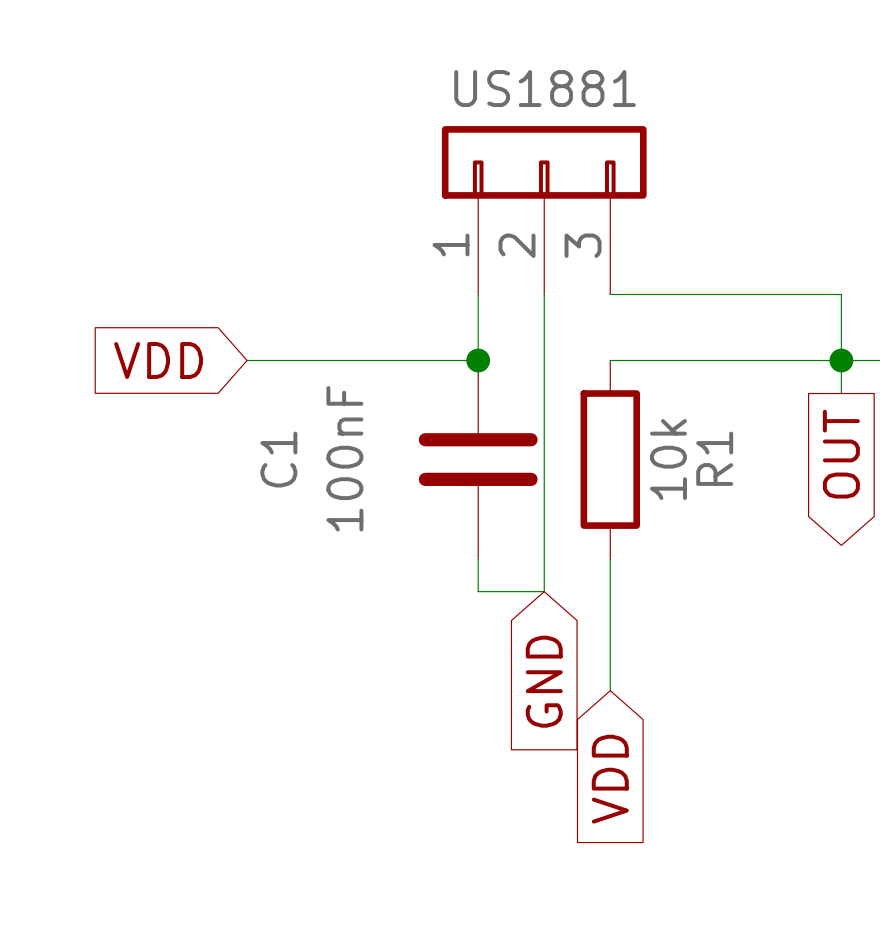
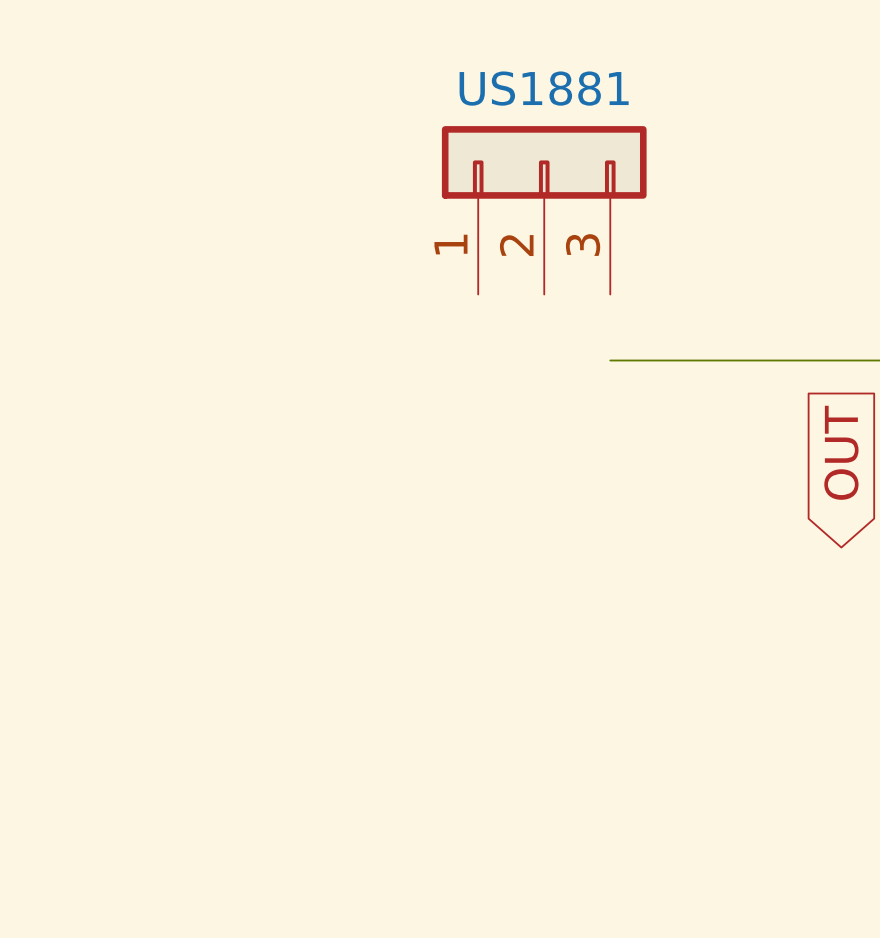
wire: (478, 294) (478, 360) (247, 360) -> none
wire: (544, 294) (544, 591) (478, 591) (478, 558) -> none
wire: (610, 294) (841, 294) (841, 393) -> none
global label: VDD (158, 360) -> none
junction: (478, 360) -> none
junction: (841, 360) -> none
C1: 100nF (478, 459) -> none
R1: 10k (610, 459) -> none
wire: (610, 558) (610, 690) -> none
global label: GND (544, 681) -> none
global label: VDD (610, 779) -> none

